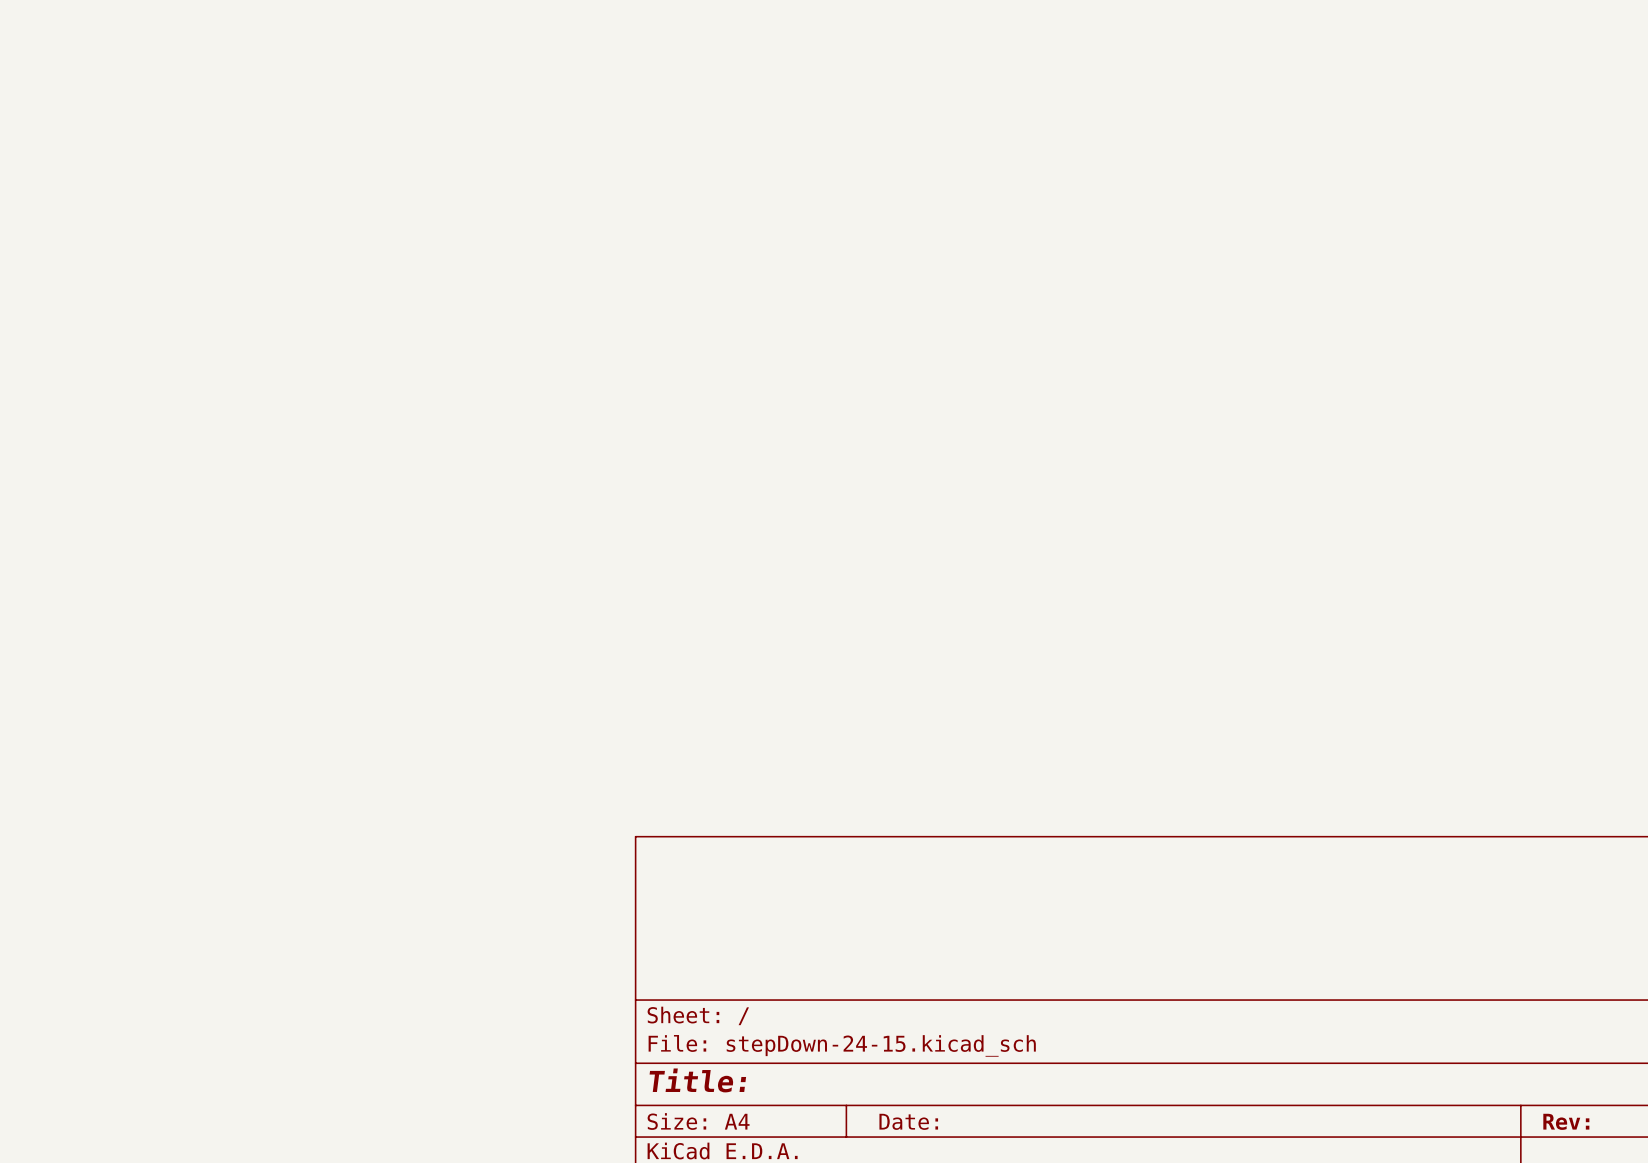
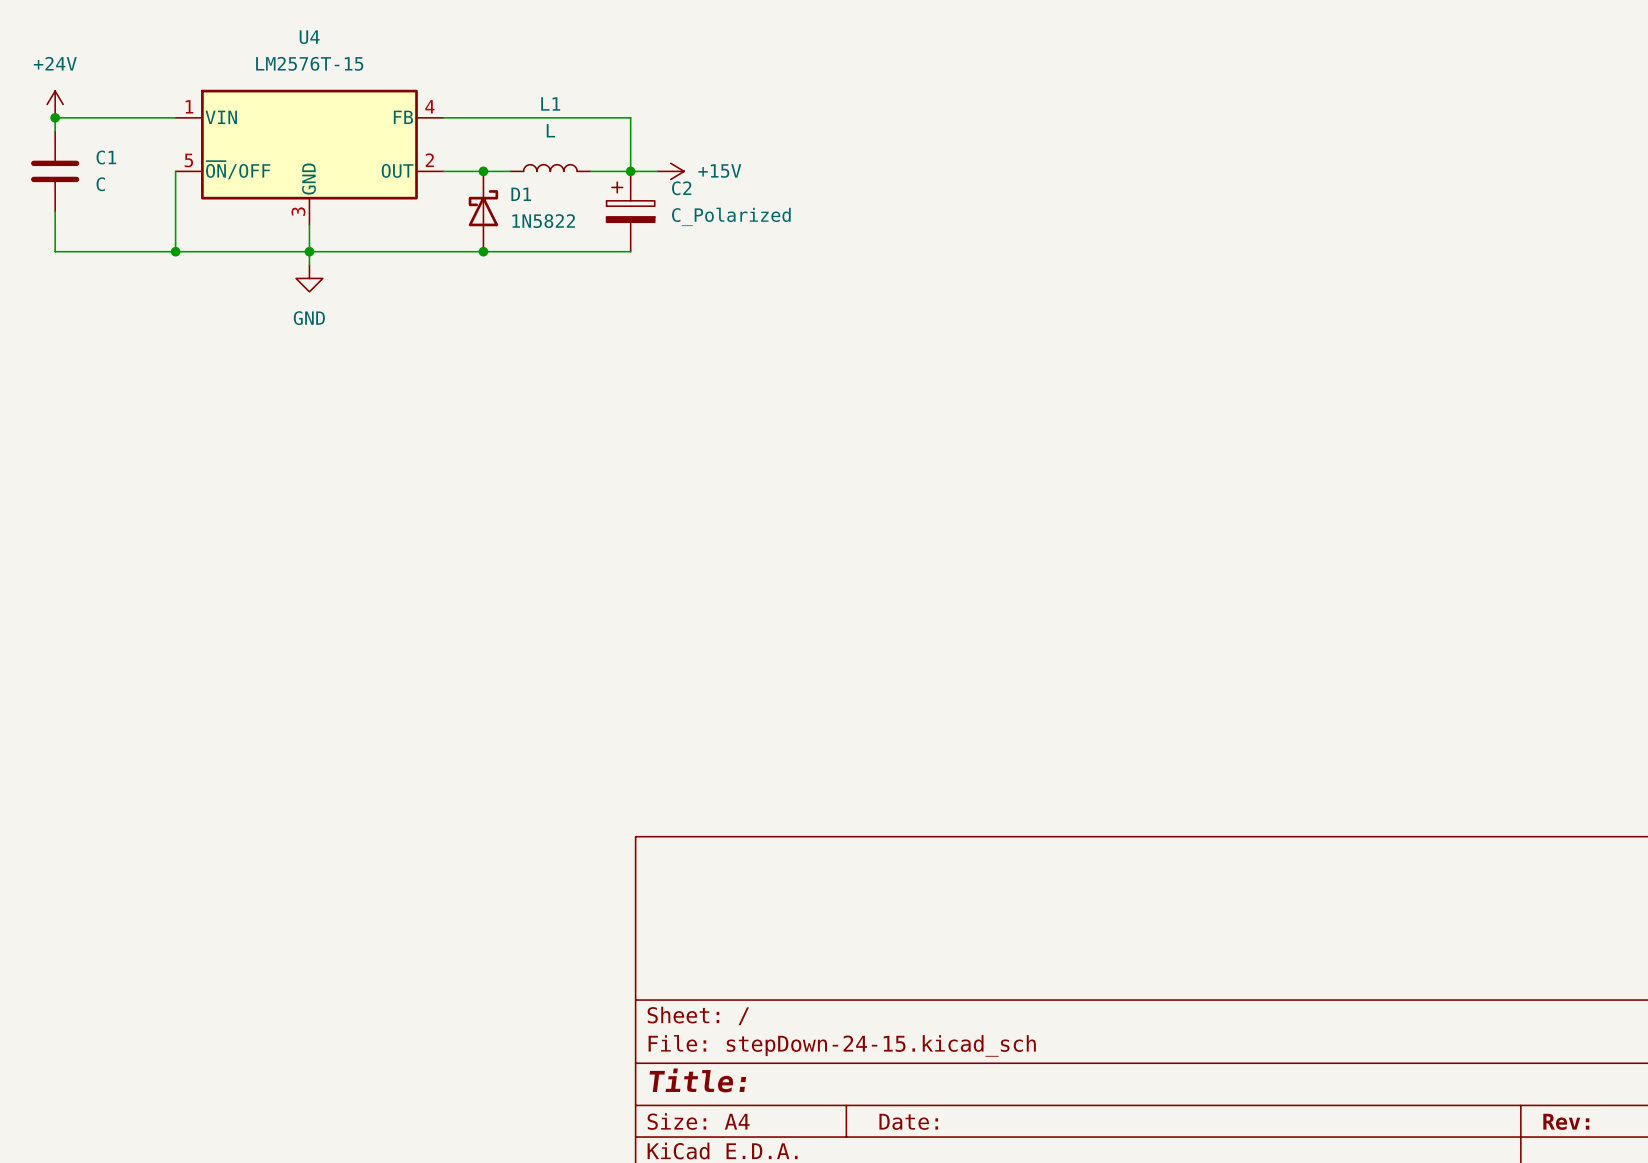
power symbol: none -> +24V (55, 104)
junction: none -> (55, 117)
wire: none -> (175, 117) (55, 117) (55, 131)
wire: none -> (443, 117) (630, 117) (630, 171)
U4: none -> LM2576T-15 (309, 157)
L1: none -> L (550, 168)
C1: none -> C (55, 171)
wire: none -> (175, 171) (175, 251)
wire: none -> (443, 171) (510, 171)
junction: none -> (483, 171)
wire: none -> (590, 171) (657, 171)
junction: none -> (630, 171)
power symbol: none -> +15V (670, 171)
wire: none -> (55, 211) (55, 251) (630, 251)
D1: none -> 1N5822 (483, 211)
C2: none -> C_Polarized (630, 211)
wire: none -> (309, 224) (309, 265)
junction: none -> (175, 251)
junction: none -> (309, 251)
junction: none -> (483, 251)
power symbol: none -> GND (309, 278)

